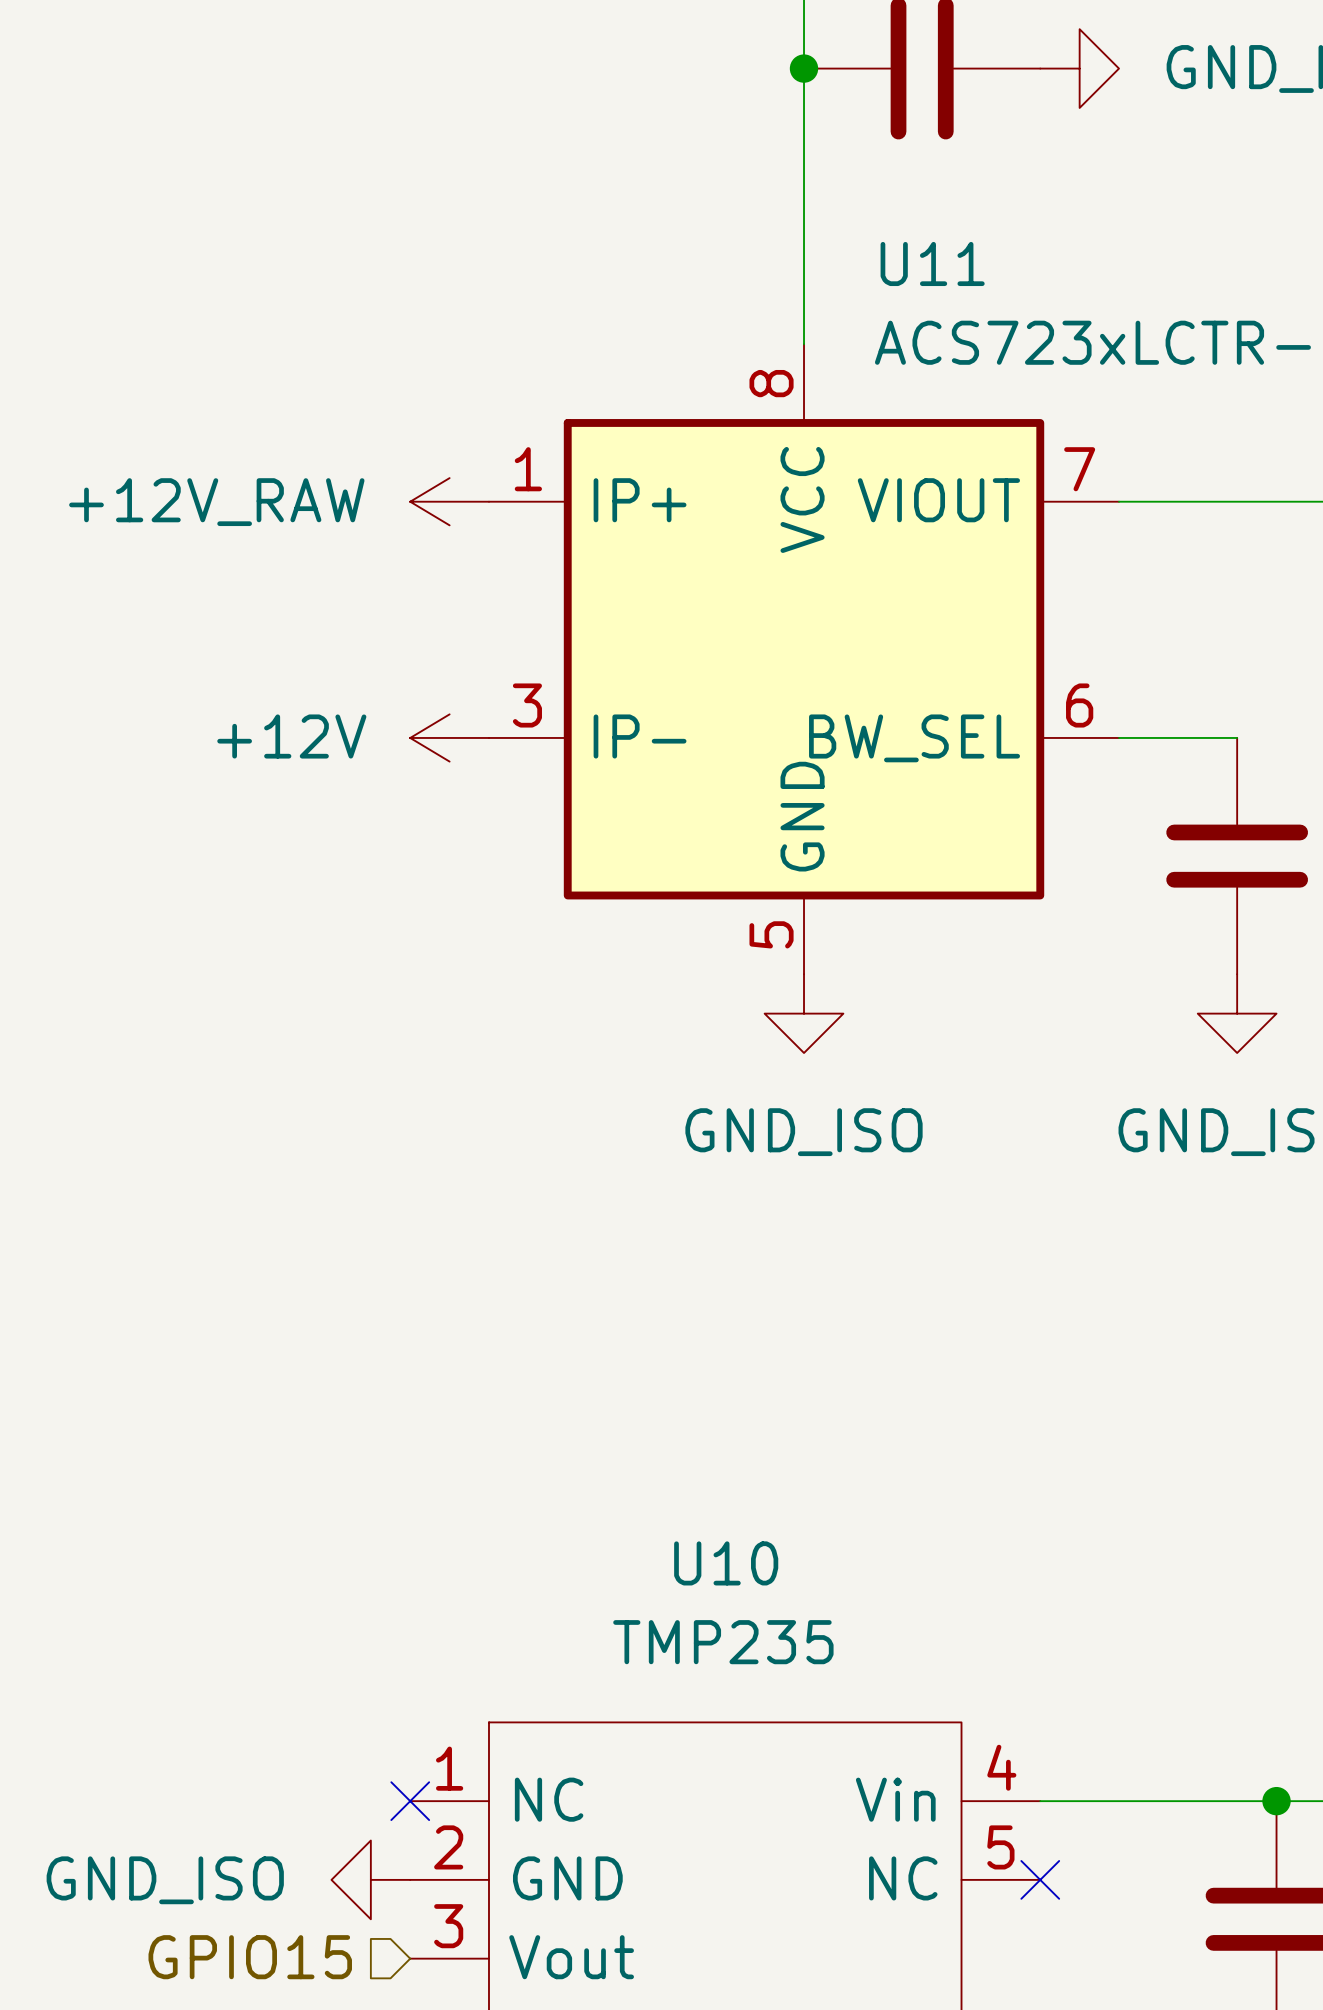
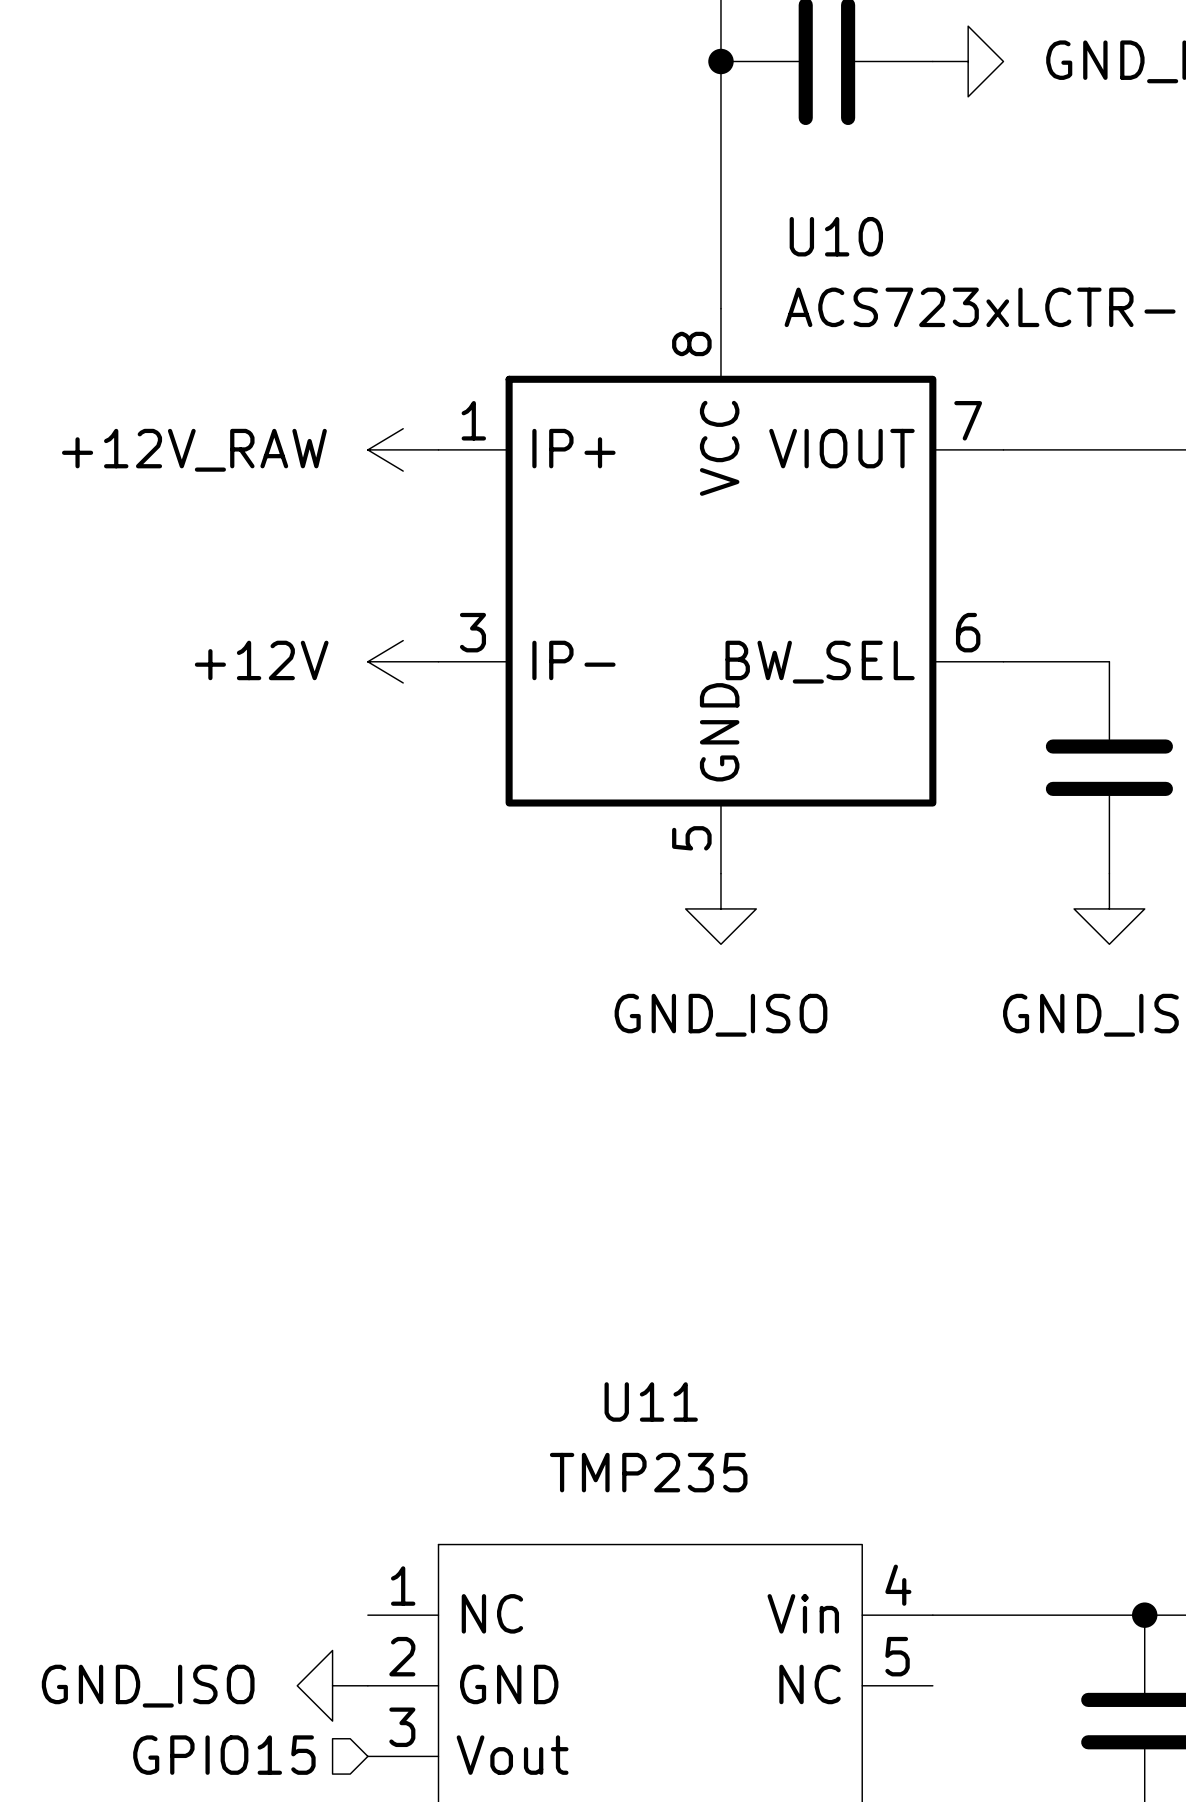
U11 name: U11 (932, 263) -> U10 (836, 236)
U10 name: U10 (726, 1563) -> U11 (651, 1401)
no-connect mark: (410, 1801) -> none
no-connect mark: (1040, 1879) -> none

